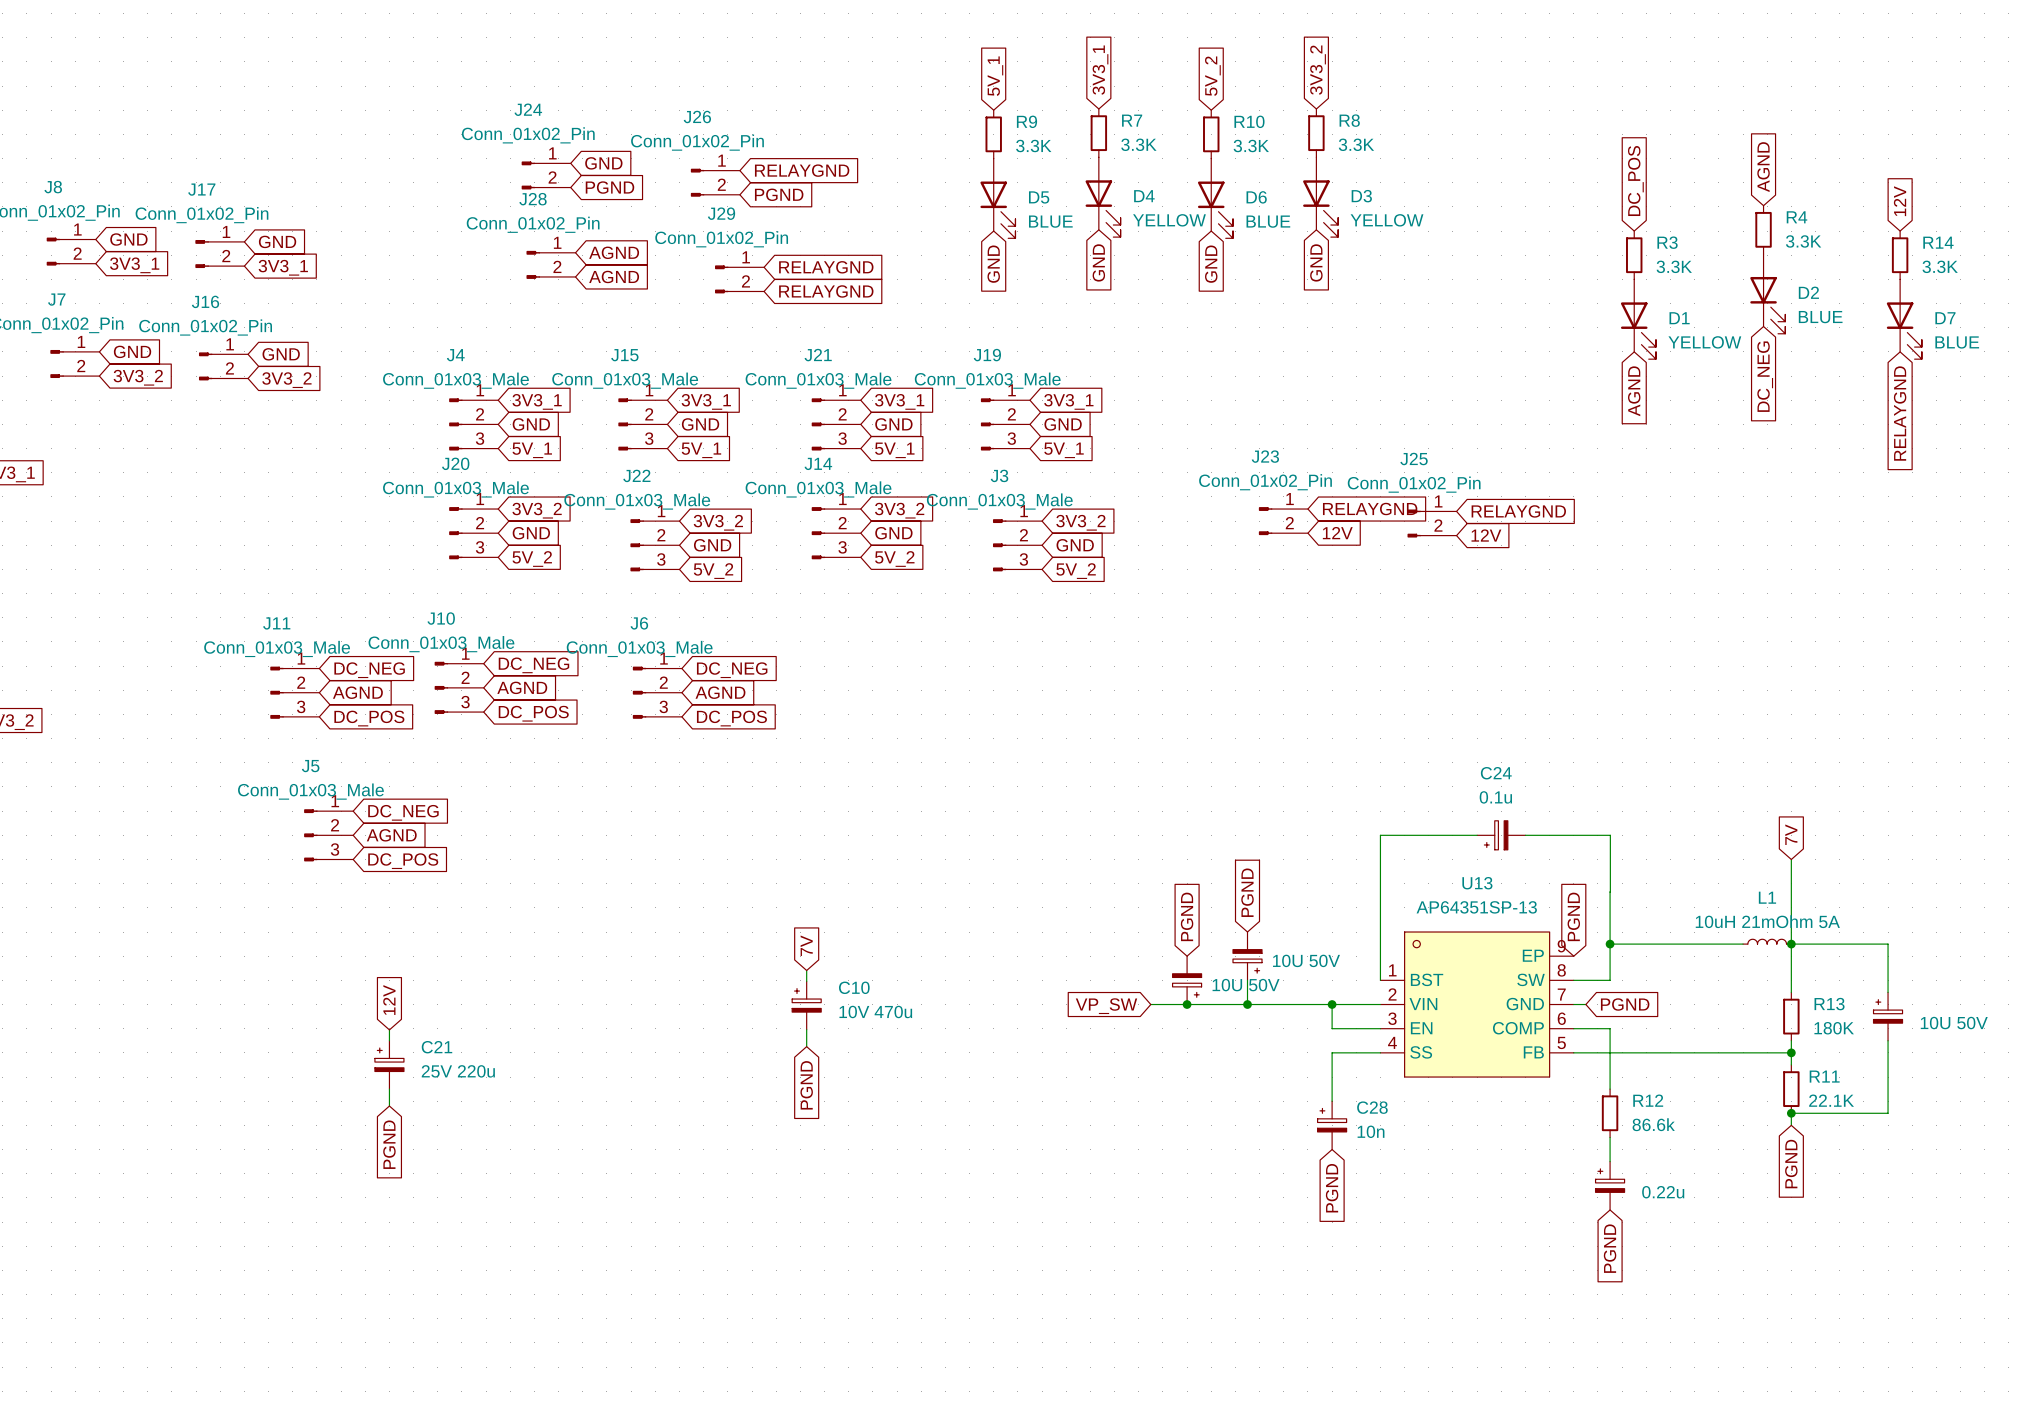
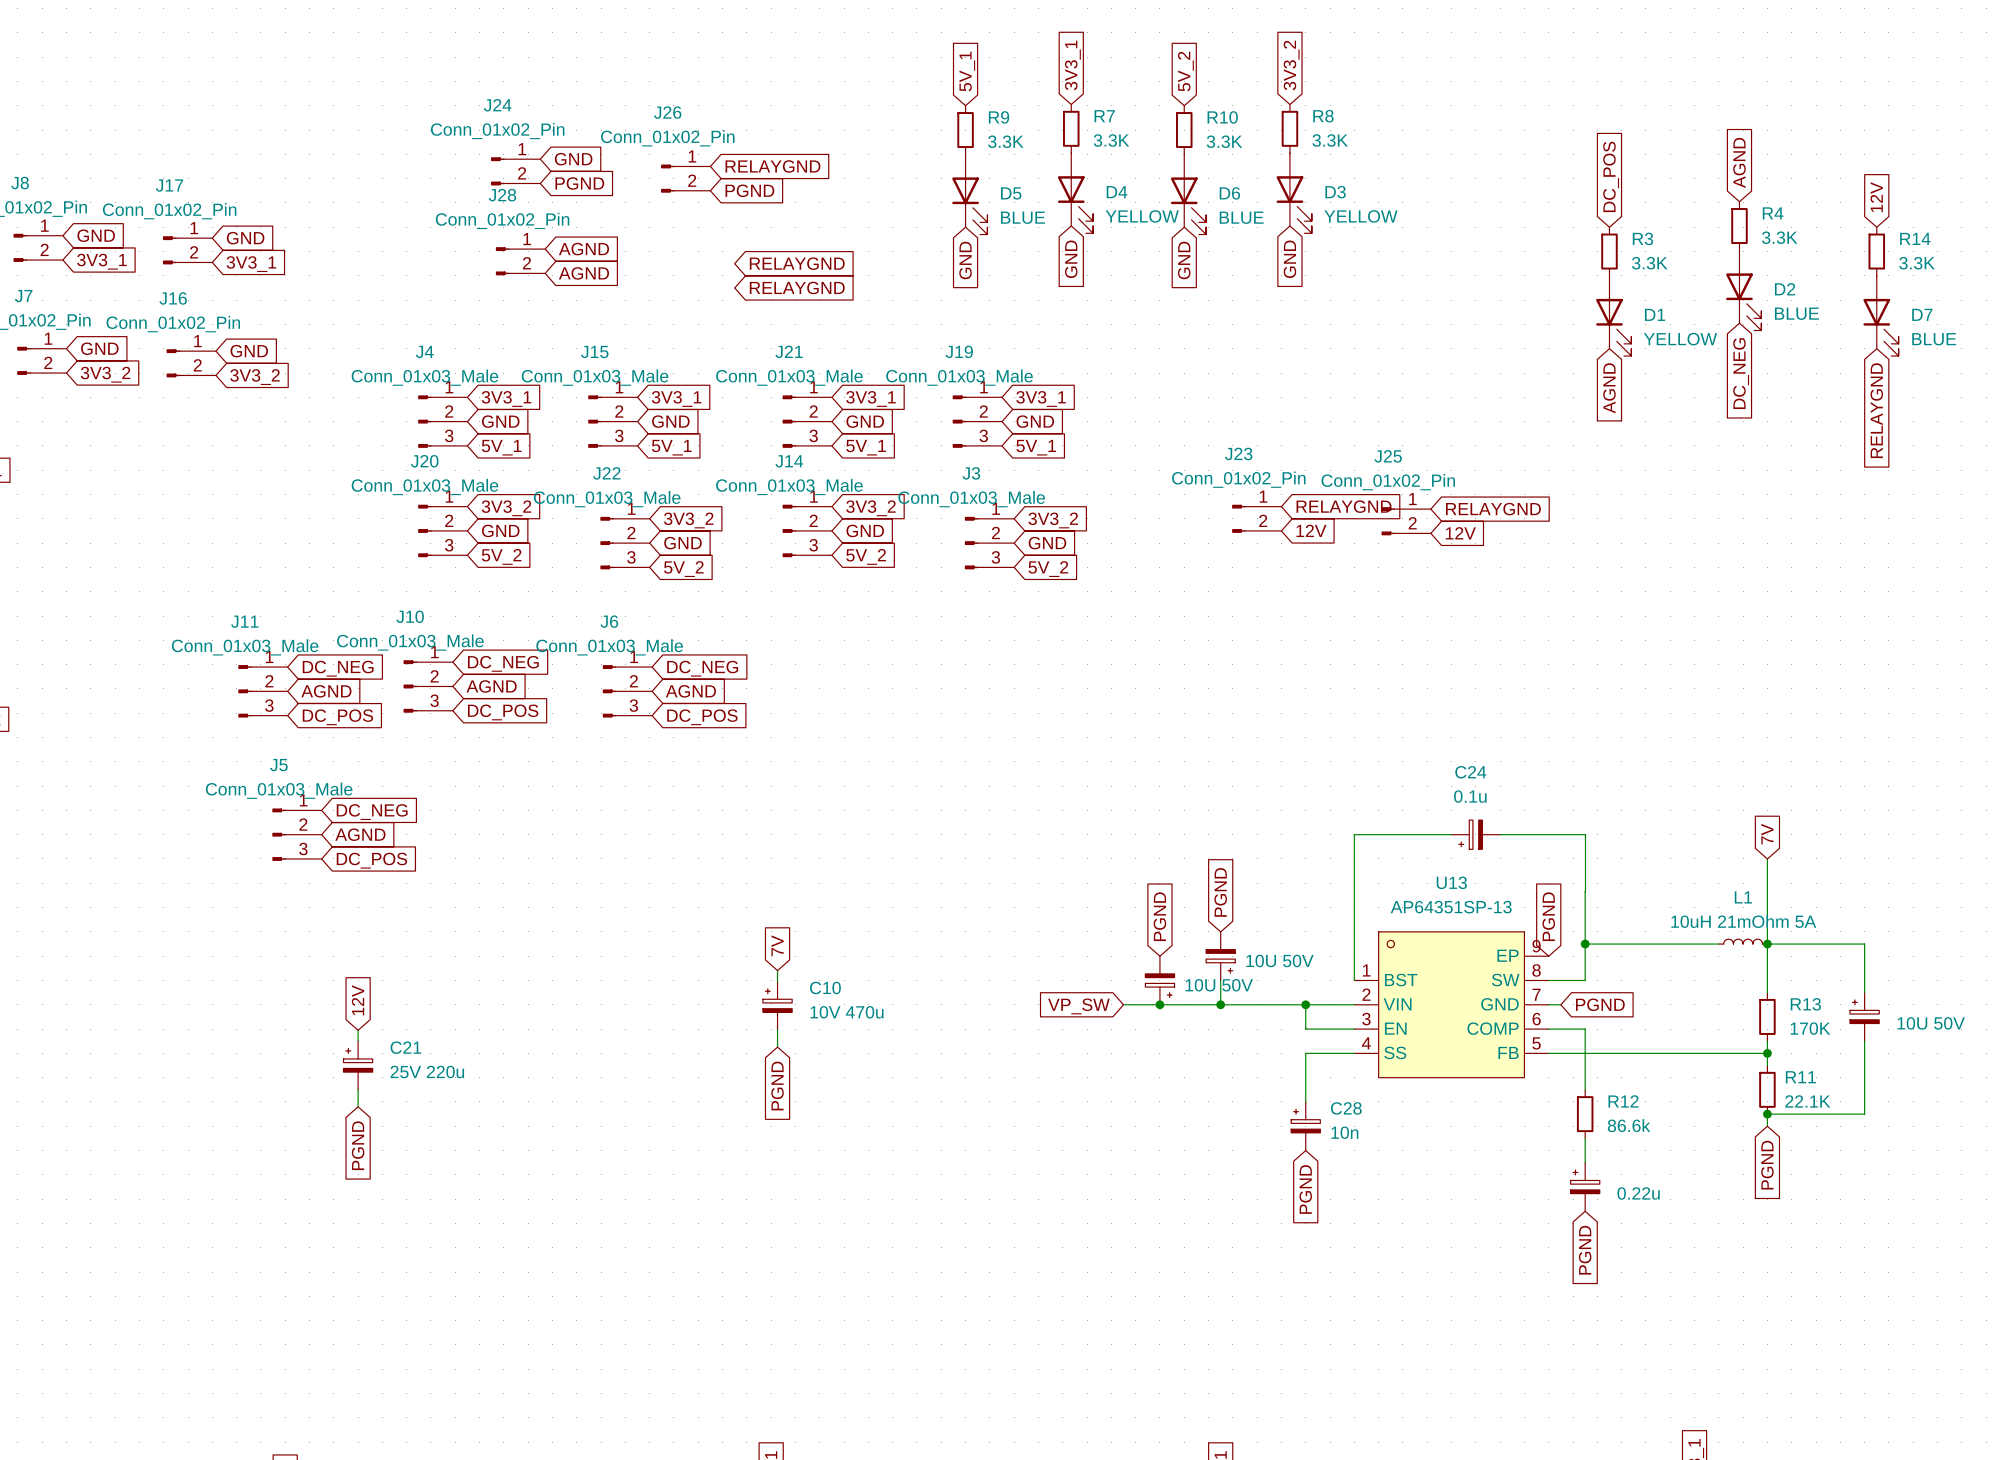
J29: Conn_01x02_Pin (739, 279) -> none
R13 value: 180K (1834, 1028) -> 170K (1810, 1028)

